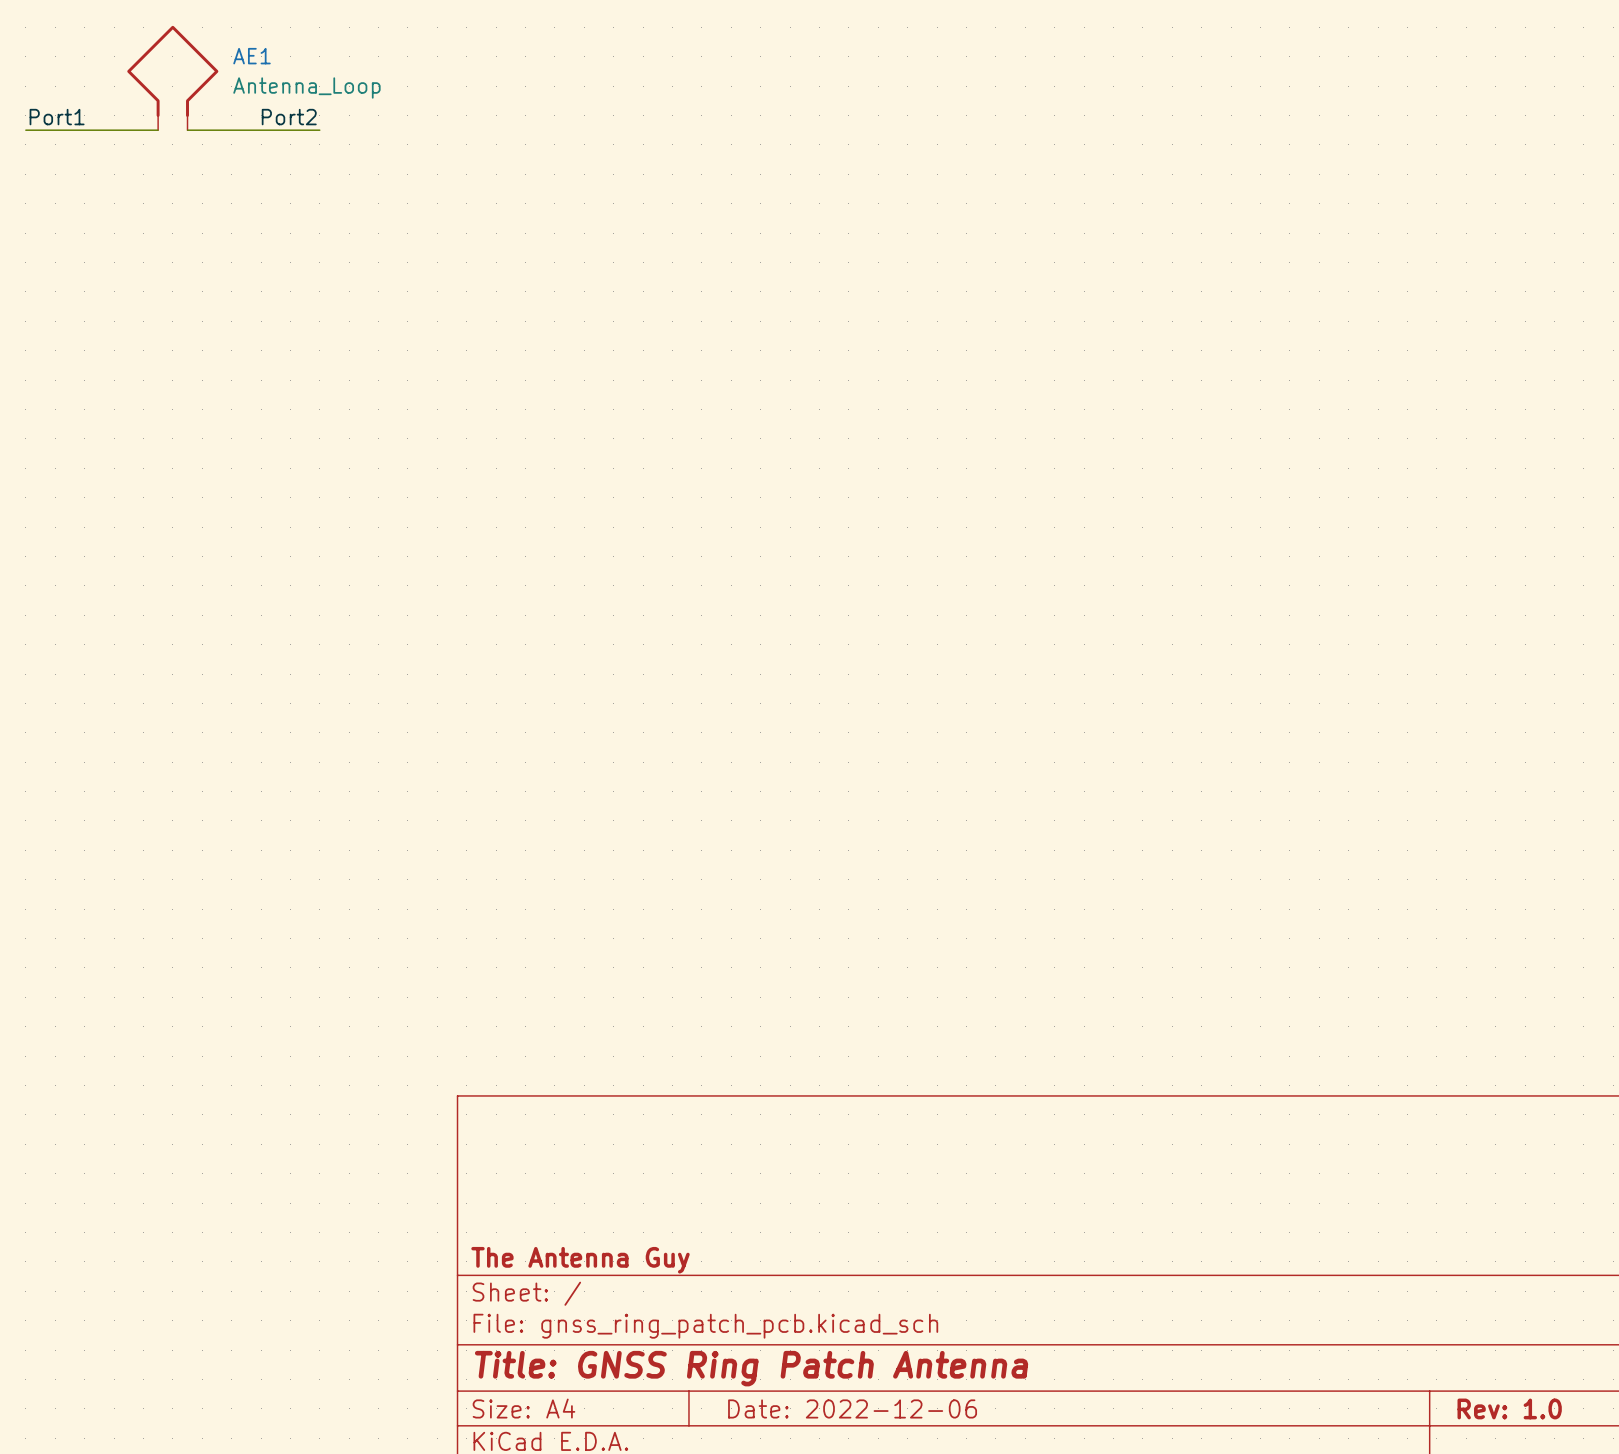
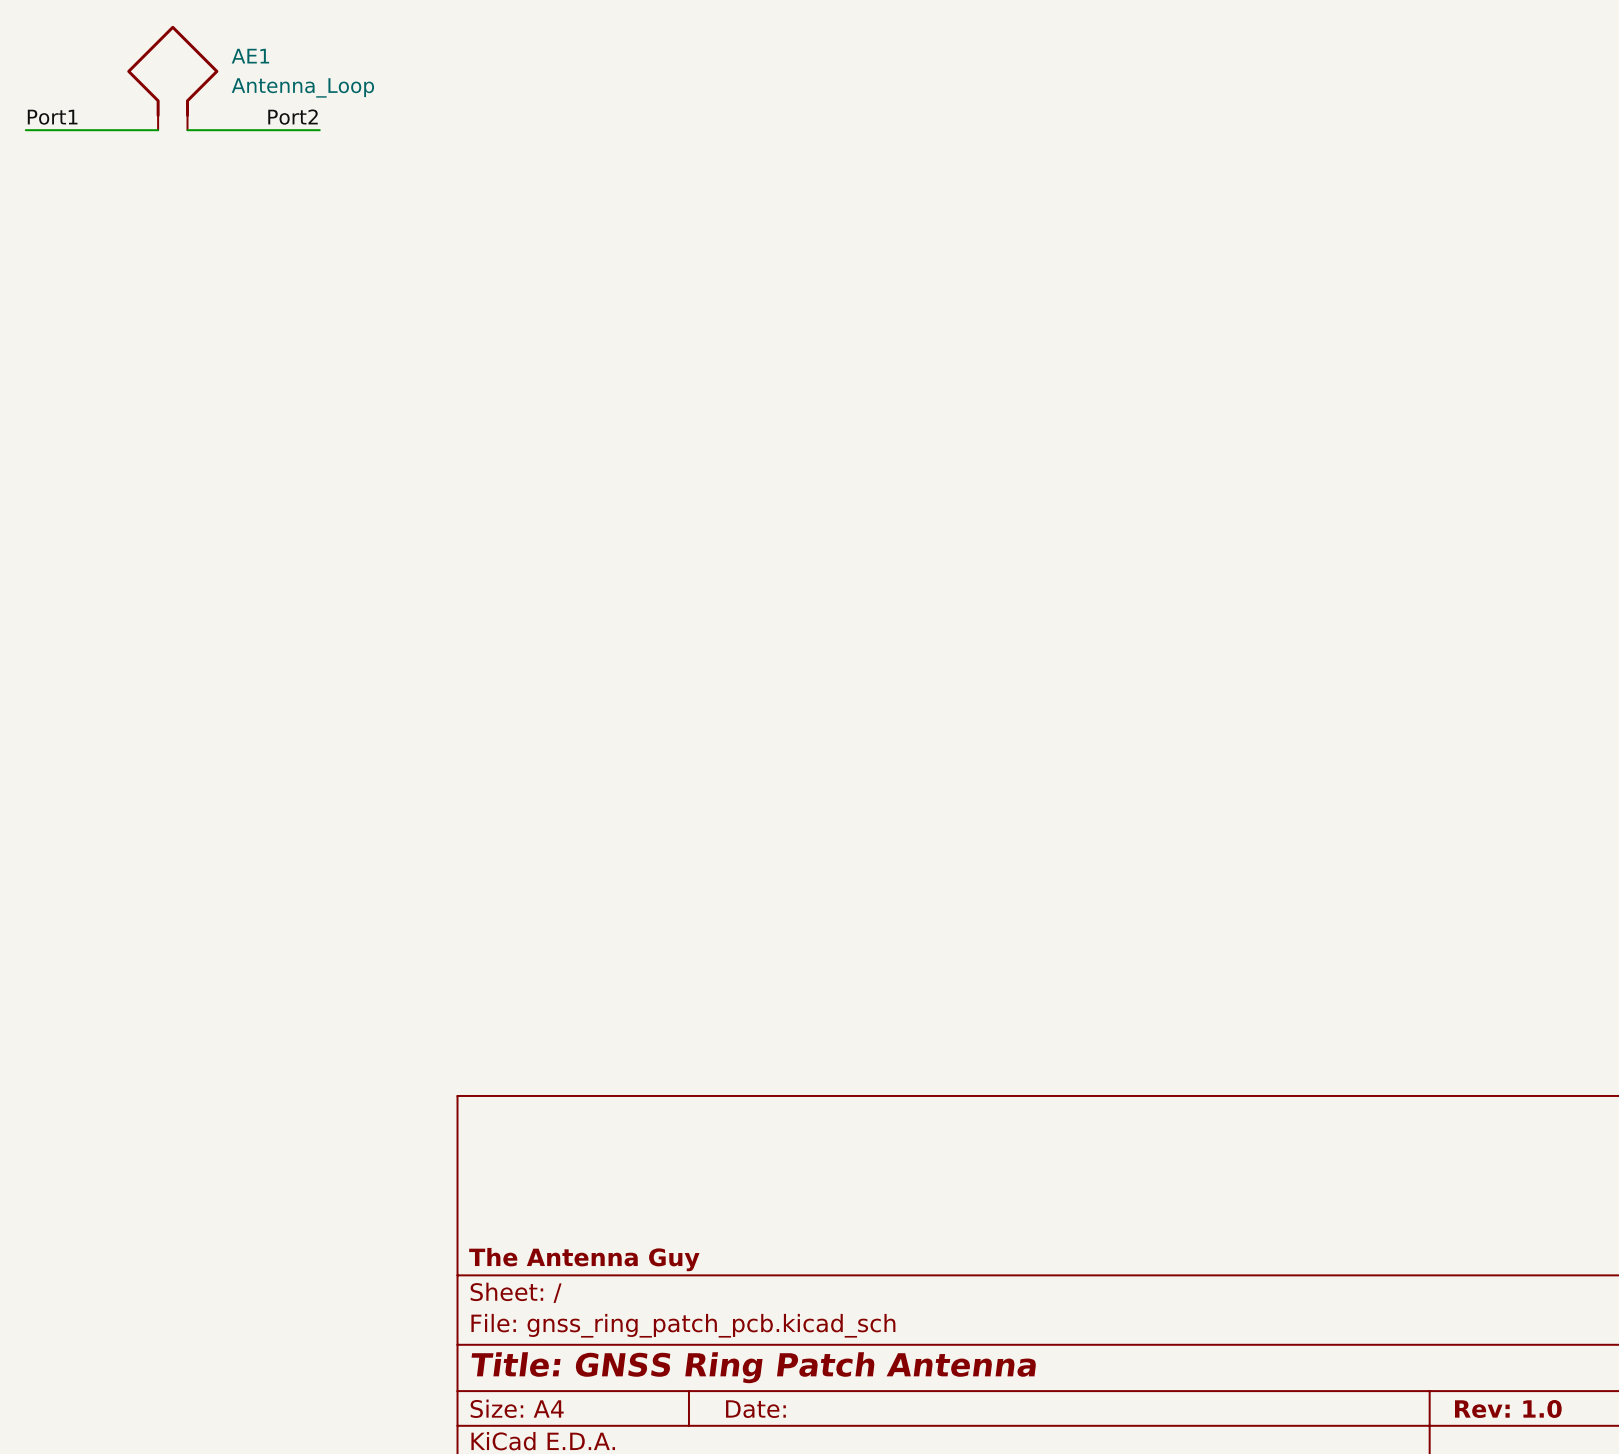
title block: Date: 2022-12-06 (852, 1408) -> Date: (755, 1409)

